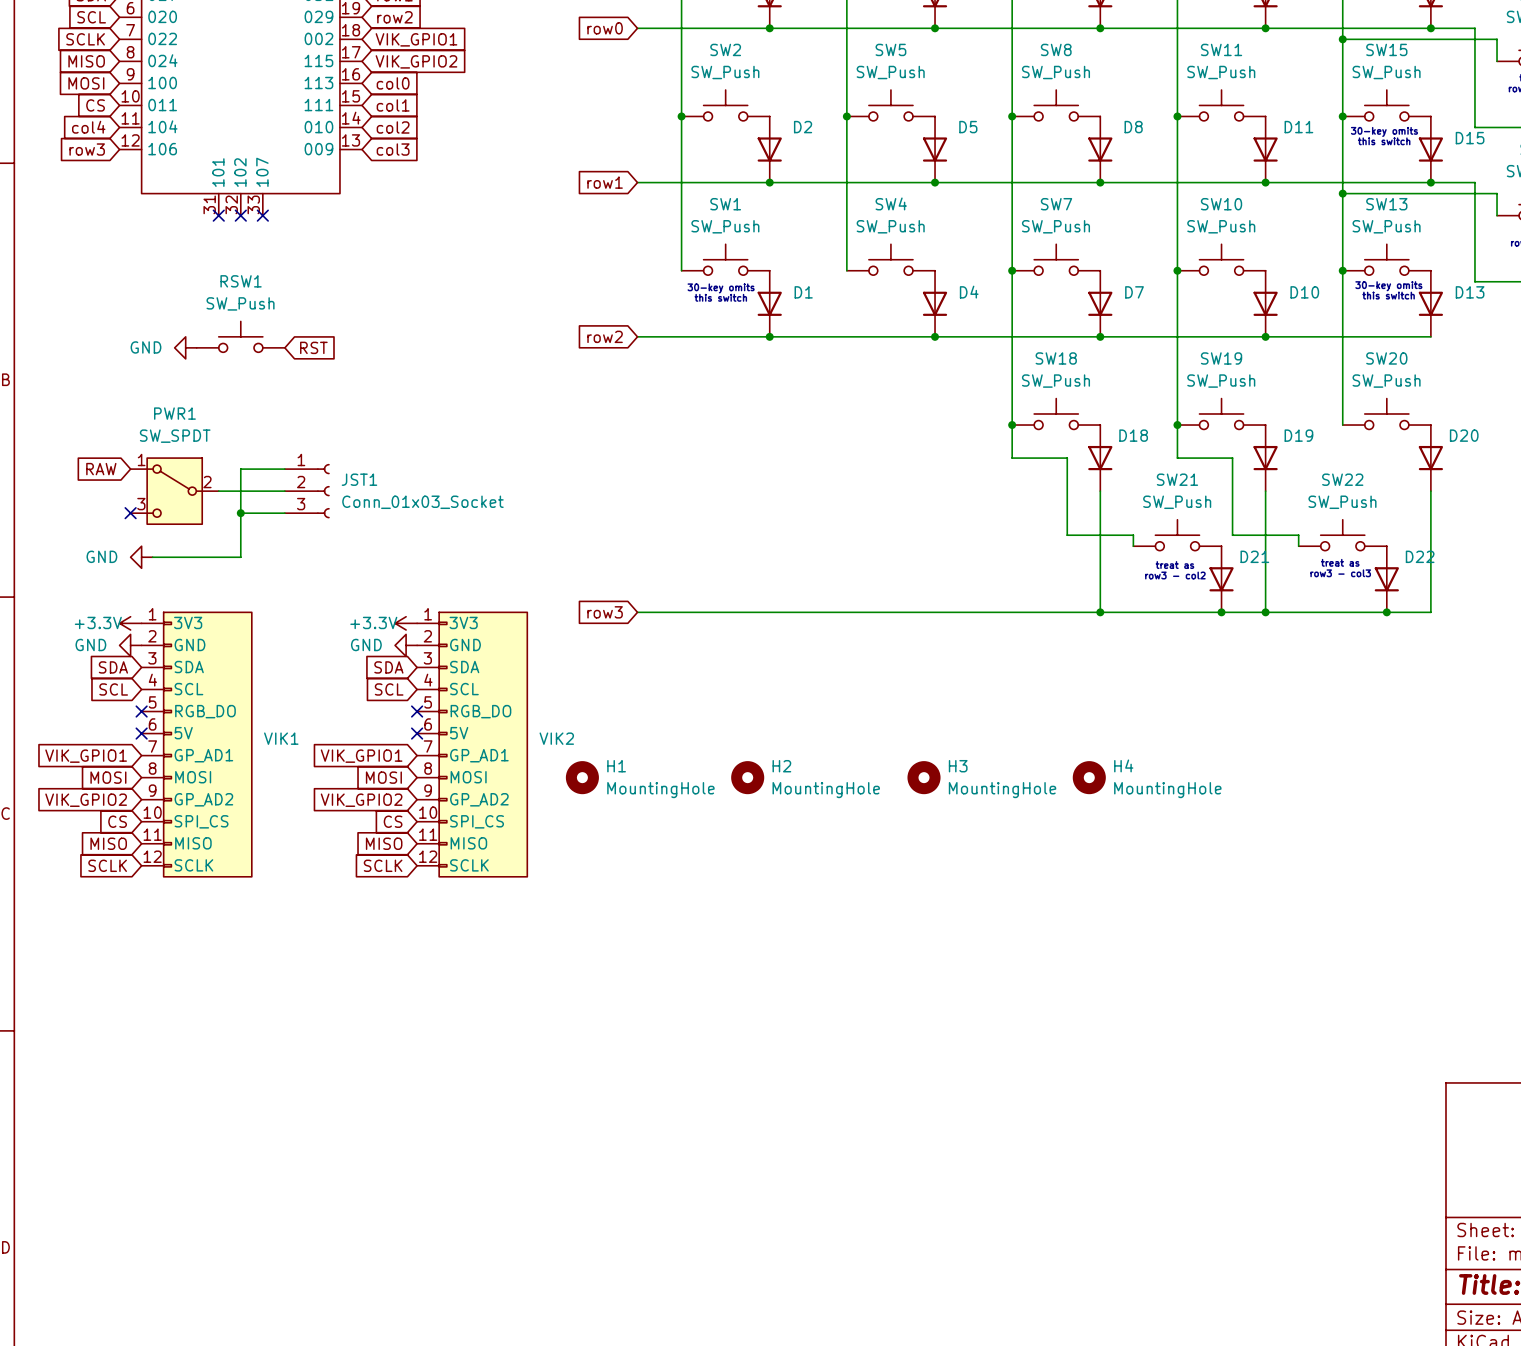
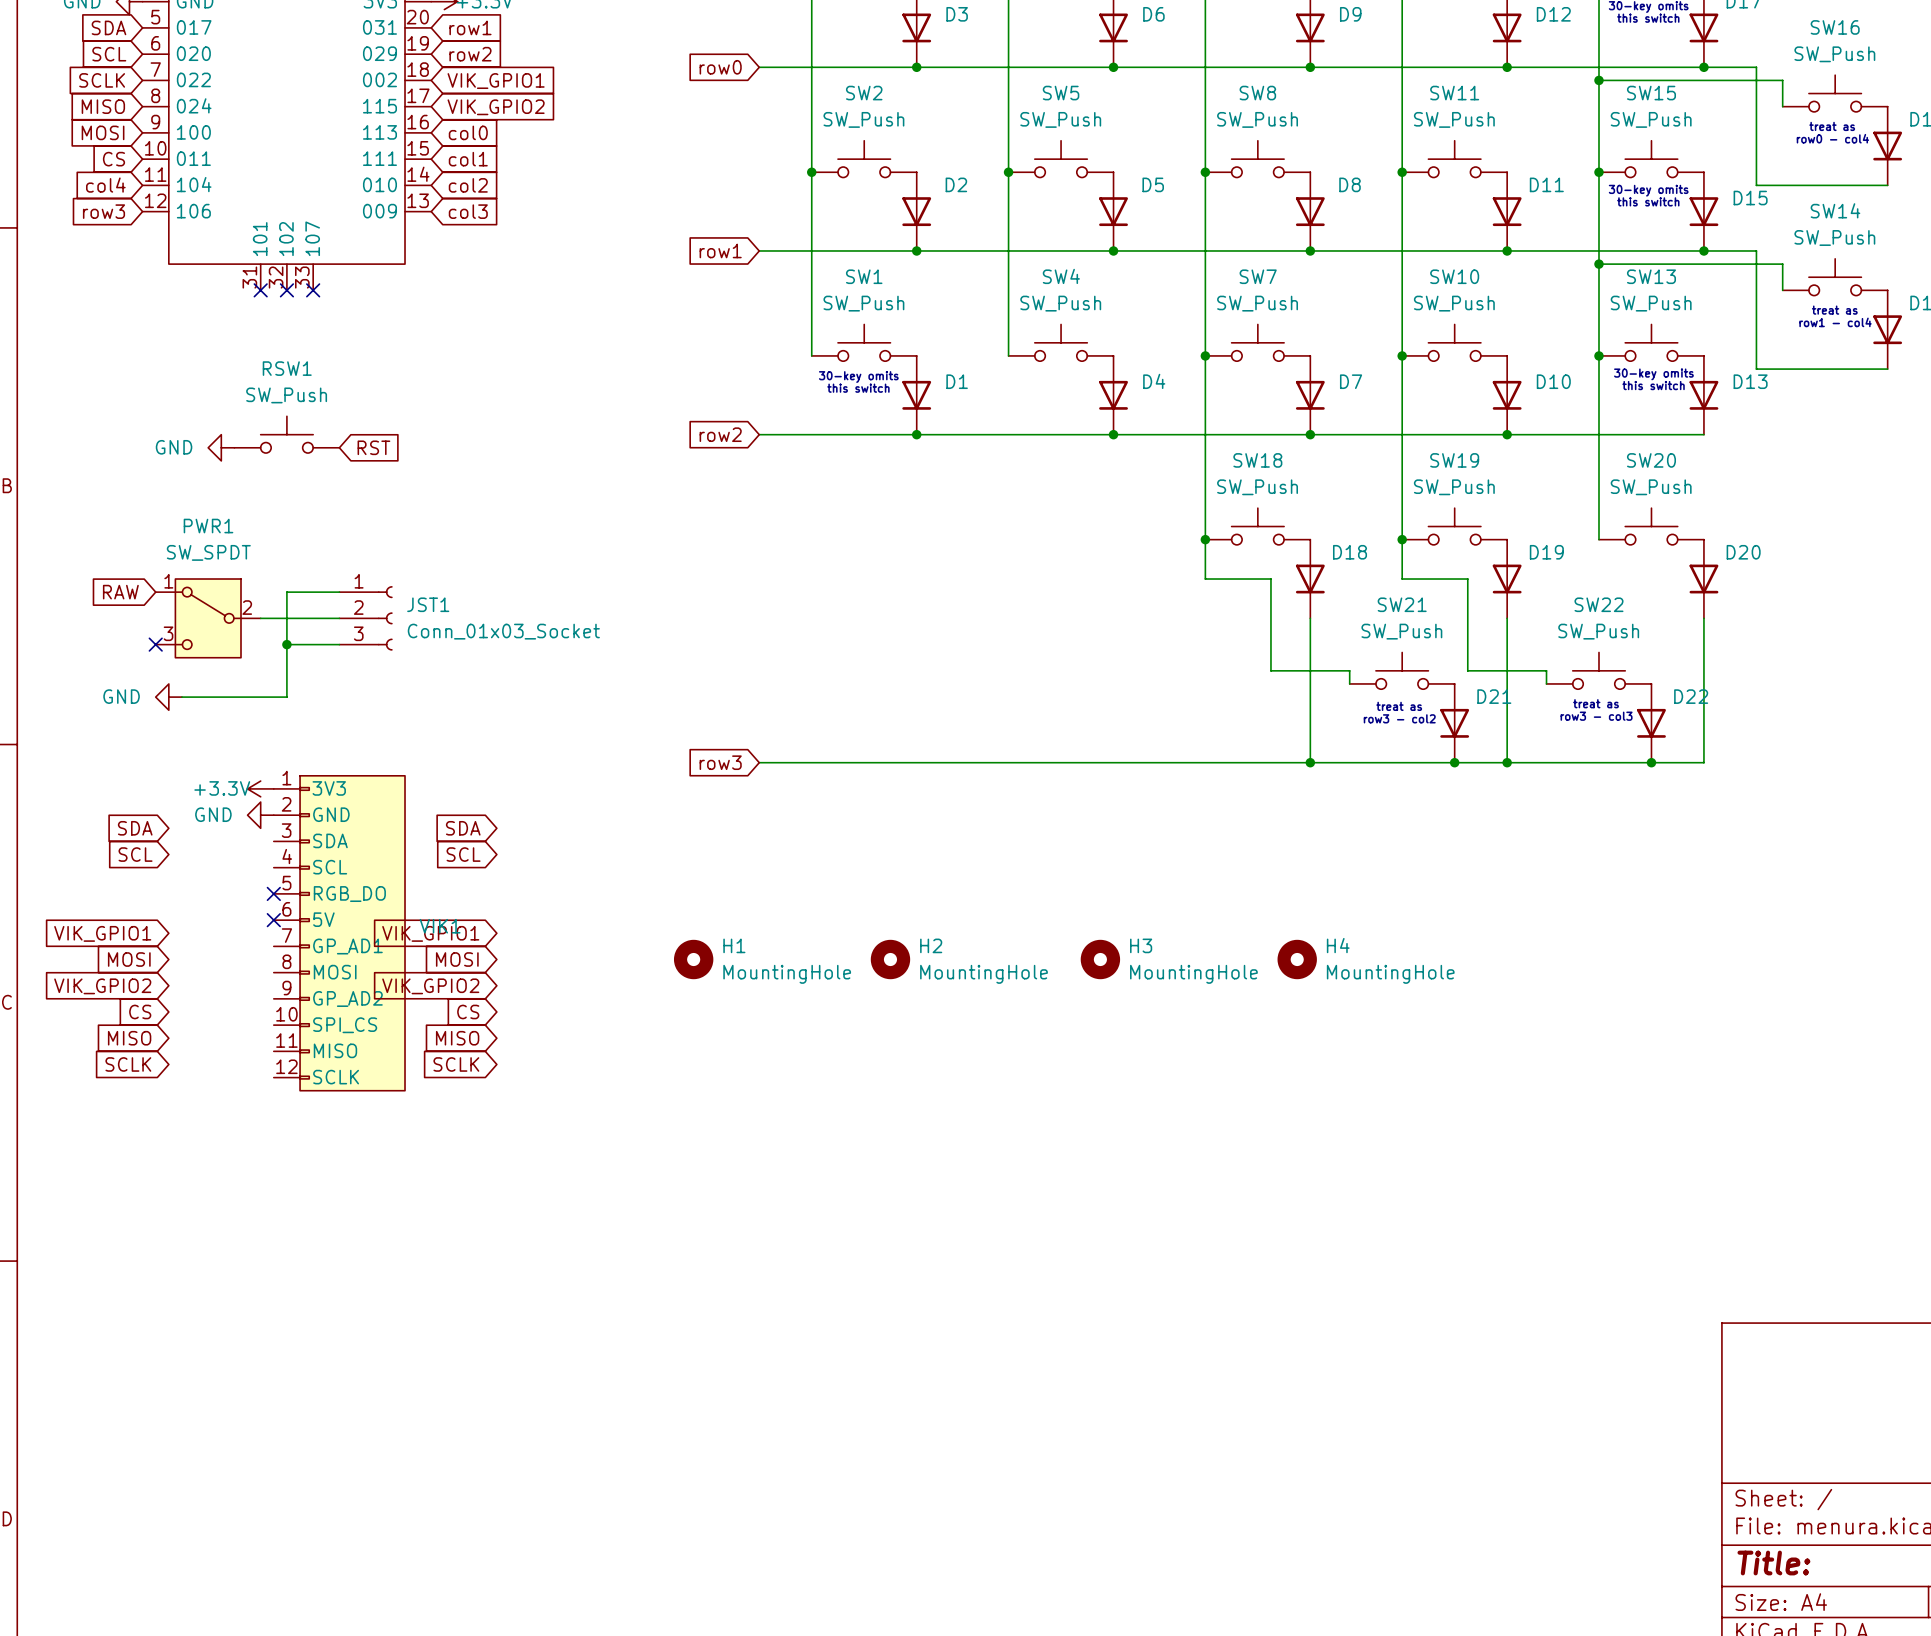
power symbol position: +3.3V (130, 623) -> +3.3V (260, 788)
power symbol: +3.3V (406, 623) -> none
power symbol position: GND (130, 645) -> GND (260, 815)
power symbol: GND (406, 645) -> none
no-connect mark: (141, 711) -> none
no-connect mark: (417, 711) -> none
no-connect mark: none -> (273, 893)
no-connect mark: (141, 733) -> none
no-connect mark: (417, 733) -> none
VIK1 position: (196, 744) -> (339, 933)
no-connect mark: none -> (273, 920)
VIK2: (472, 744) -> none

